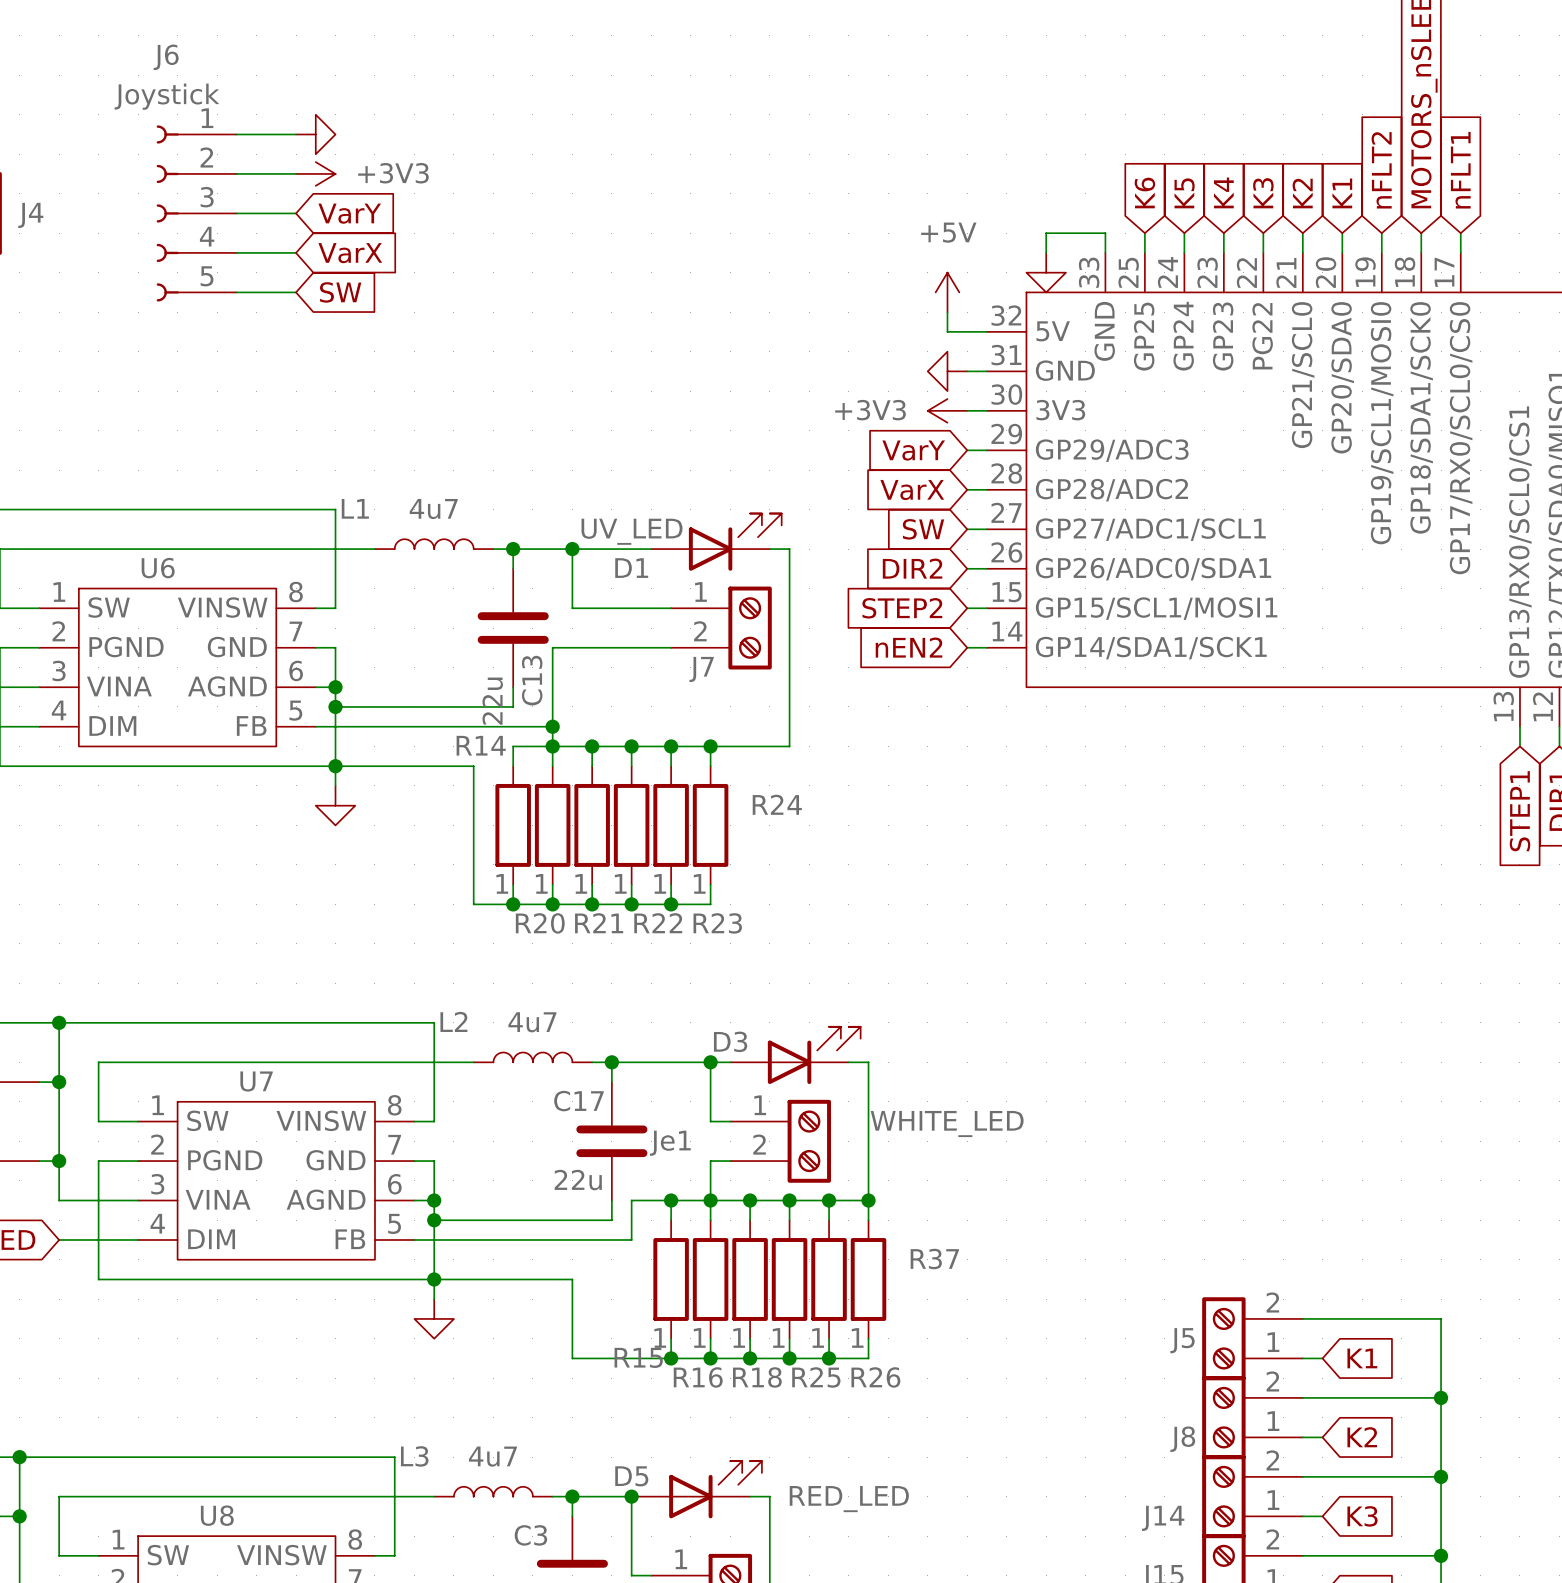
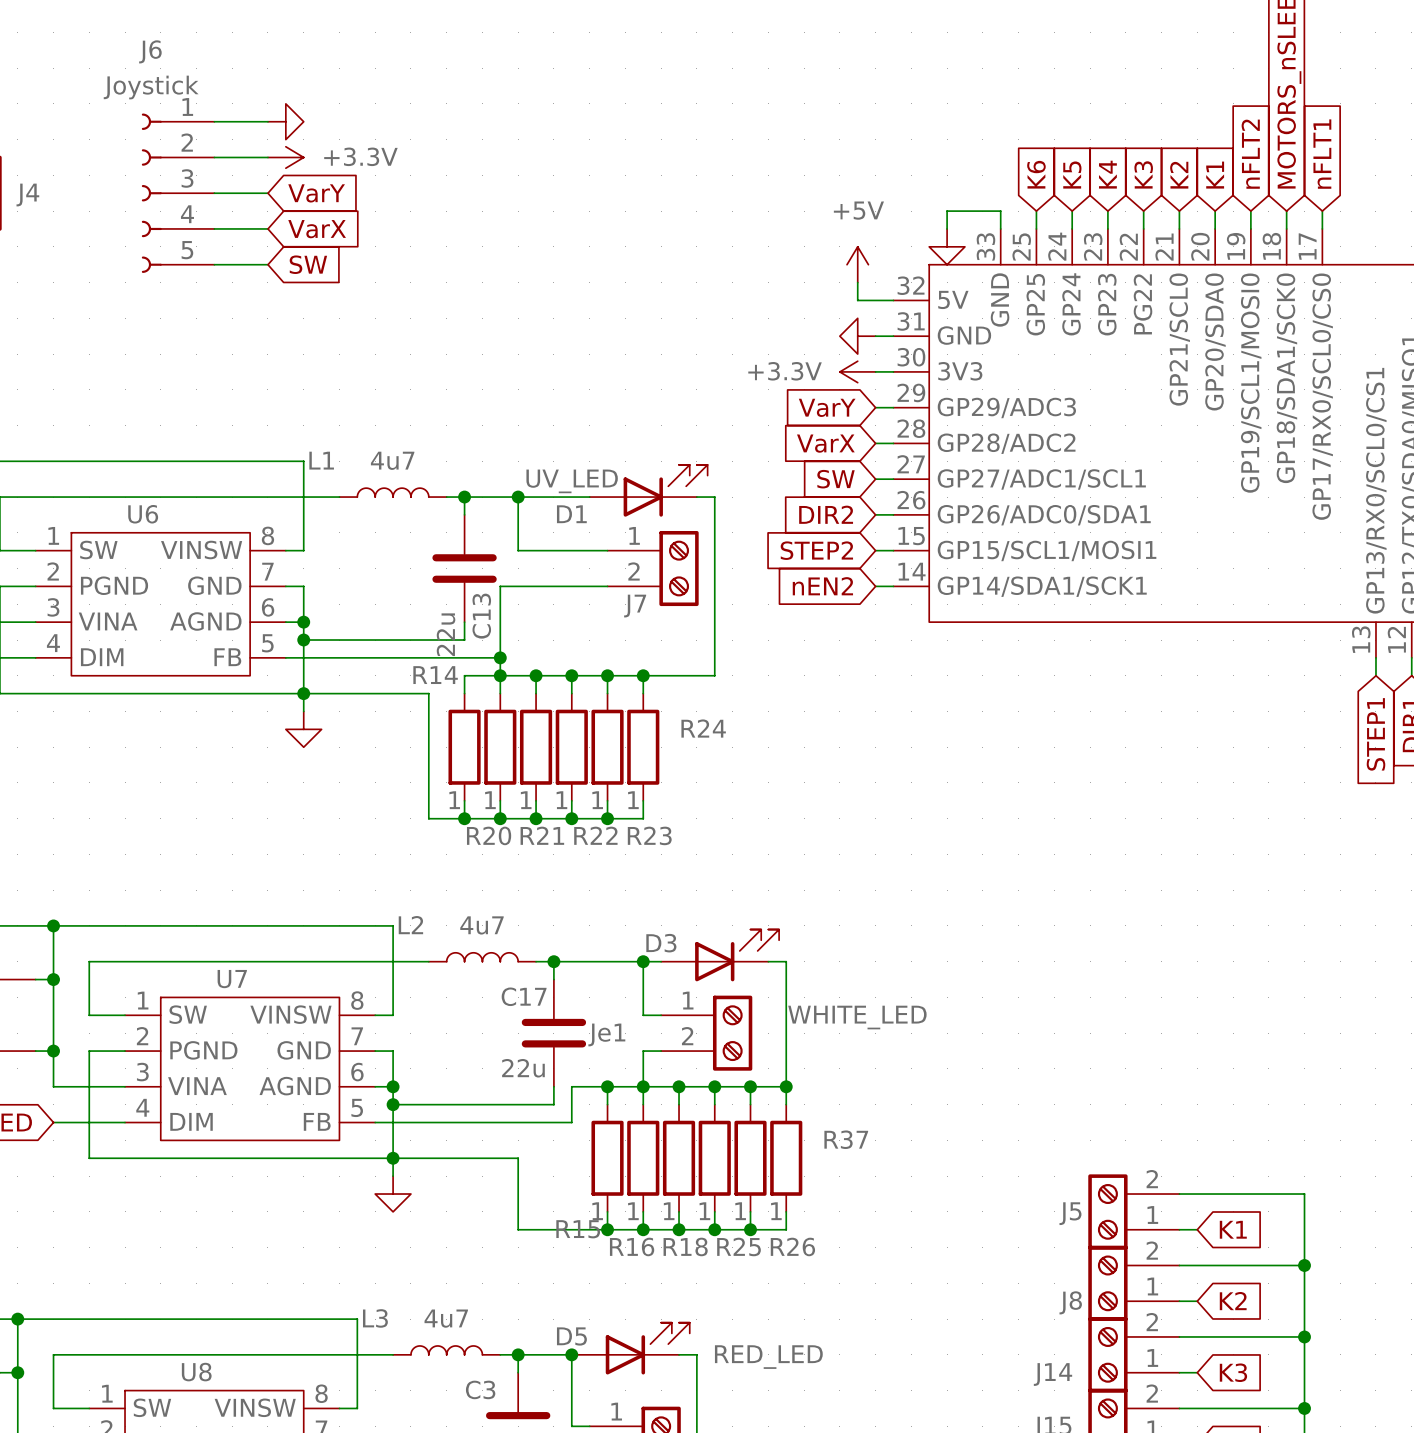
power symbol: +3V3 (315, 173) -> +3.3V (285, 157)
power symbol: +3V3 (947, 410) -> +3.3V (857, 371)

